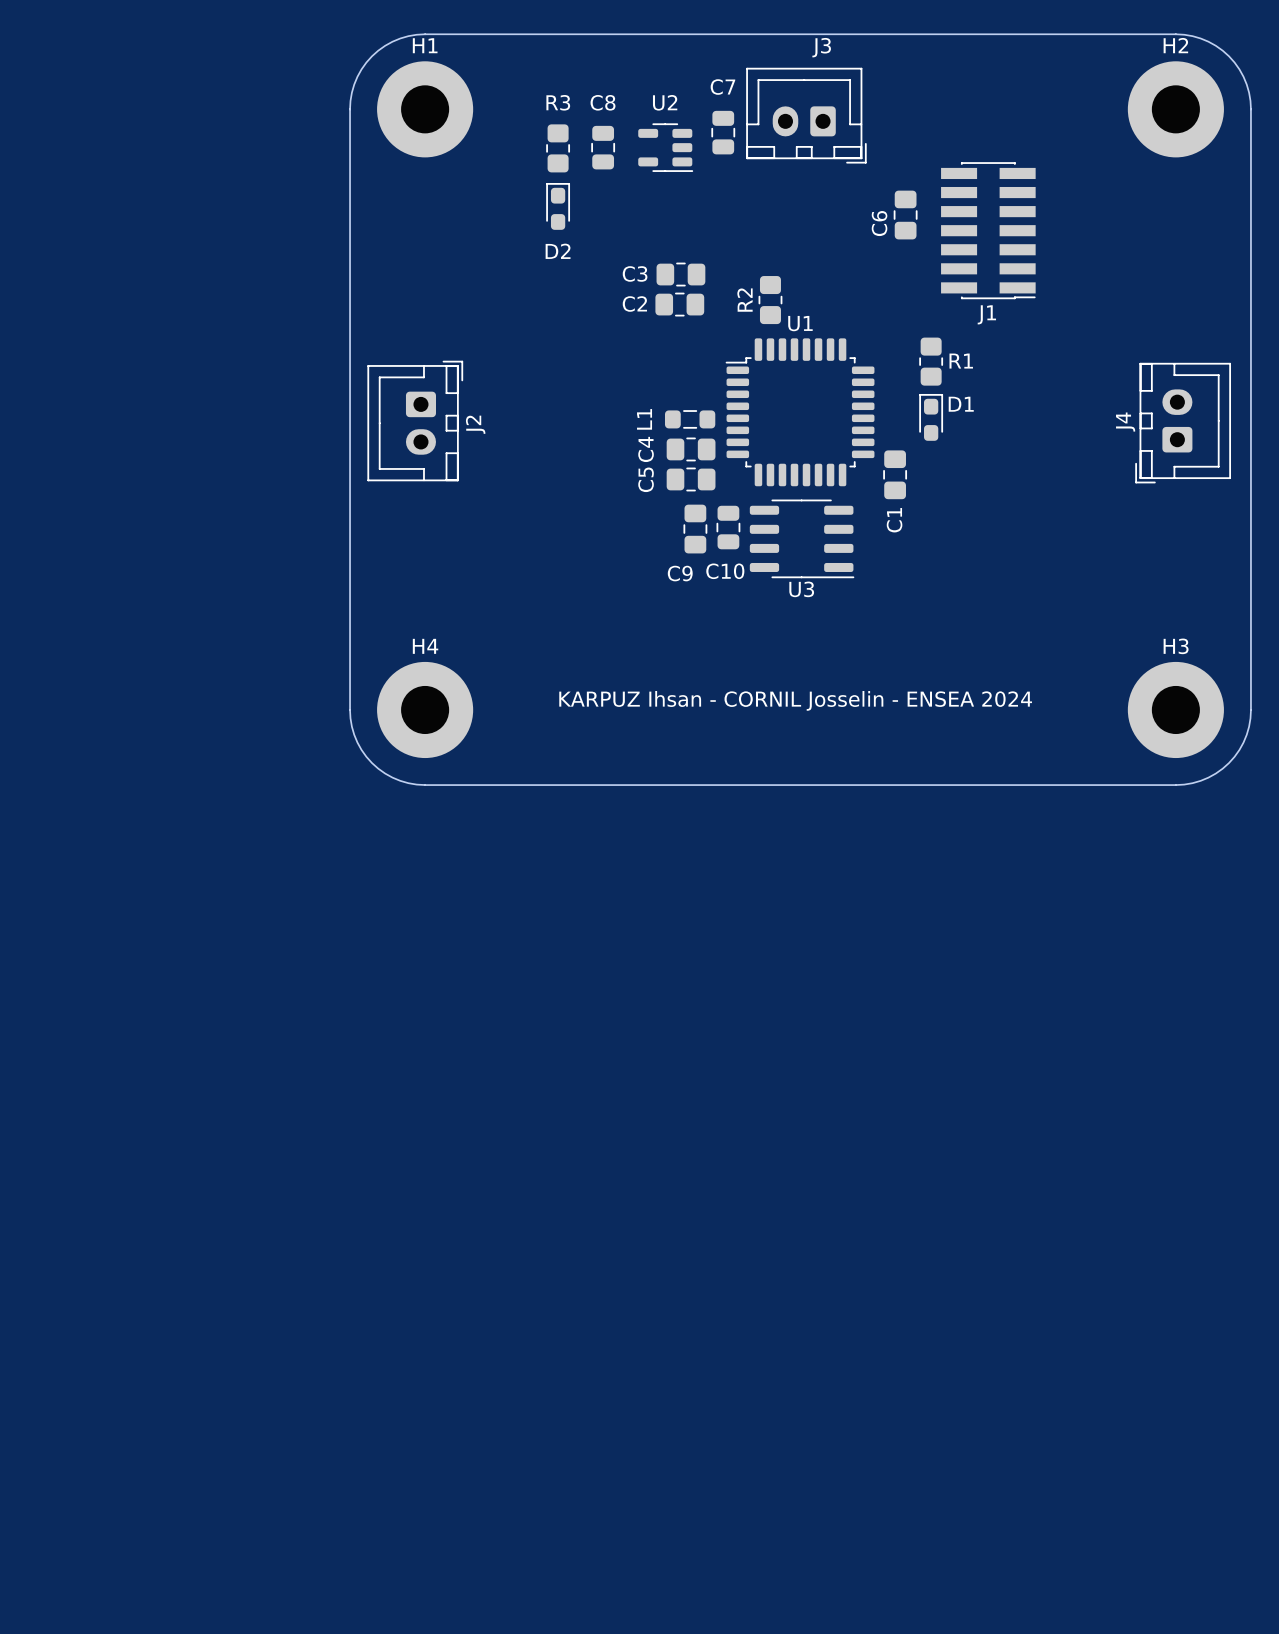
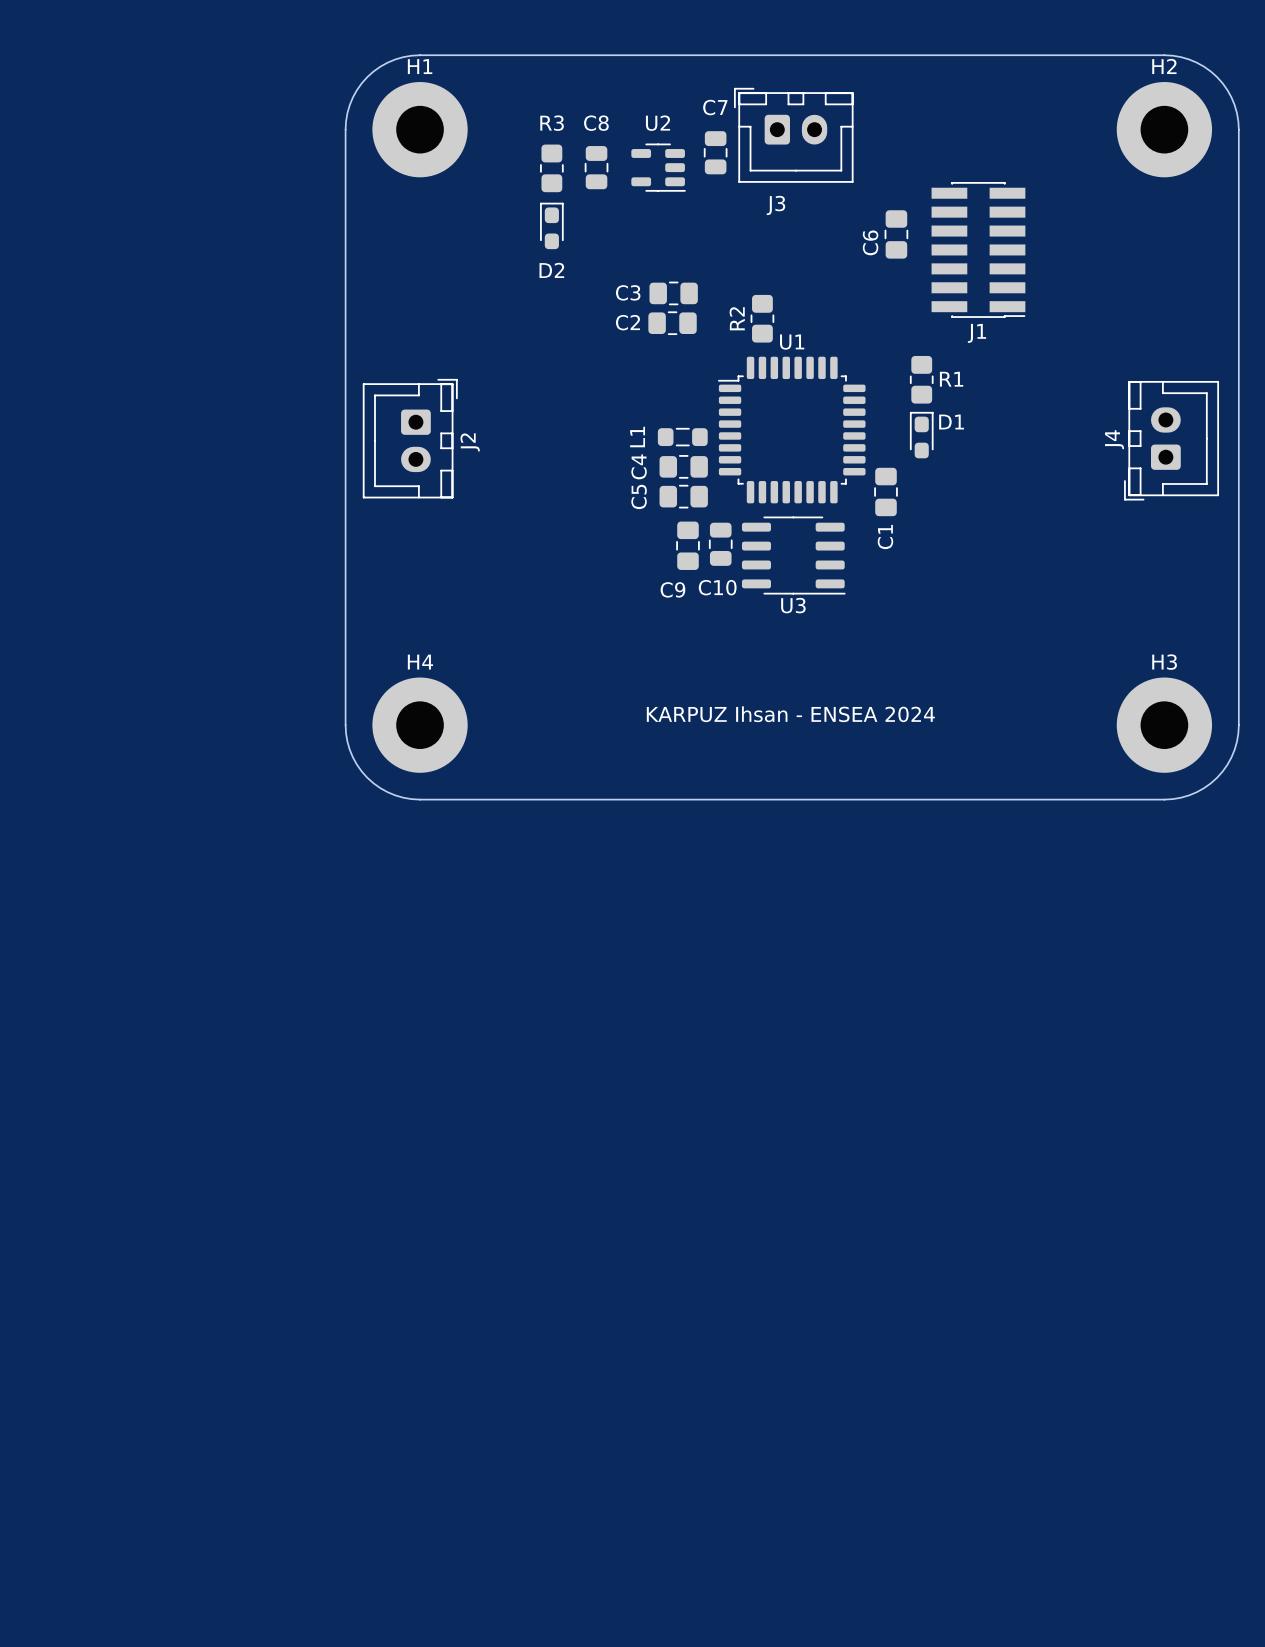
J3 rotation: 0° (806, 115) -> 180° (793, 135)
text: KARPUZ Ihsan - CORNIL Josselin - ENSEA 2024 (795, 700) -> KARPUZ Ihsan - ENSEA 2024 (790, 714)

